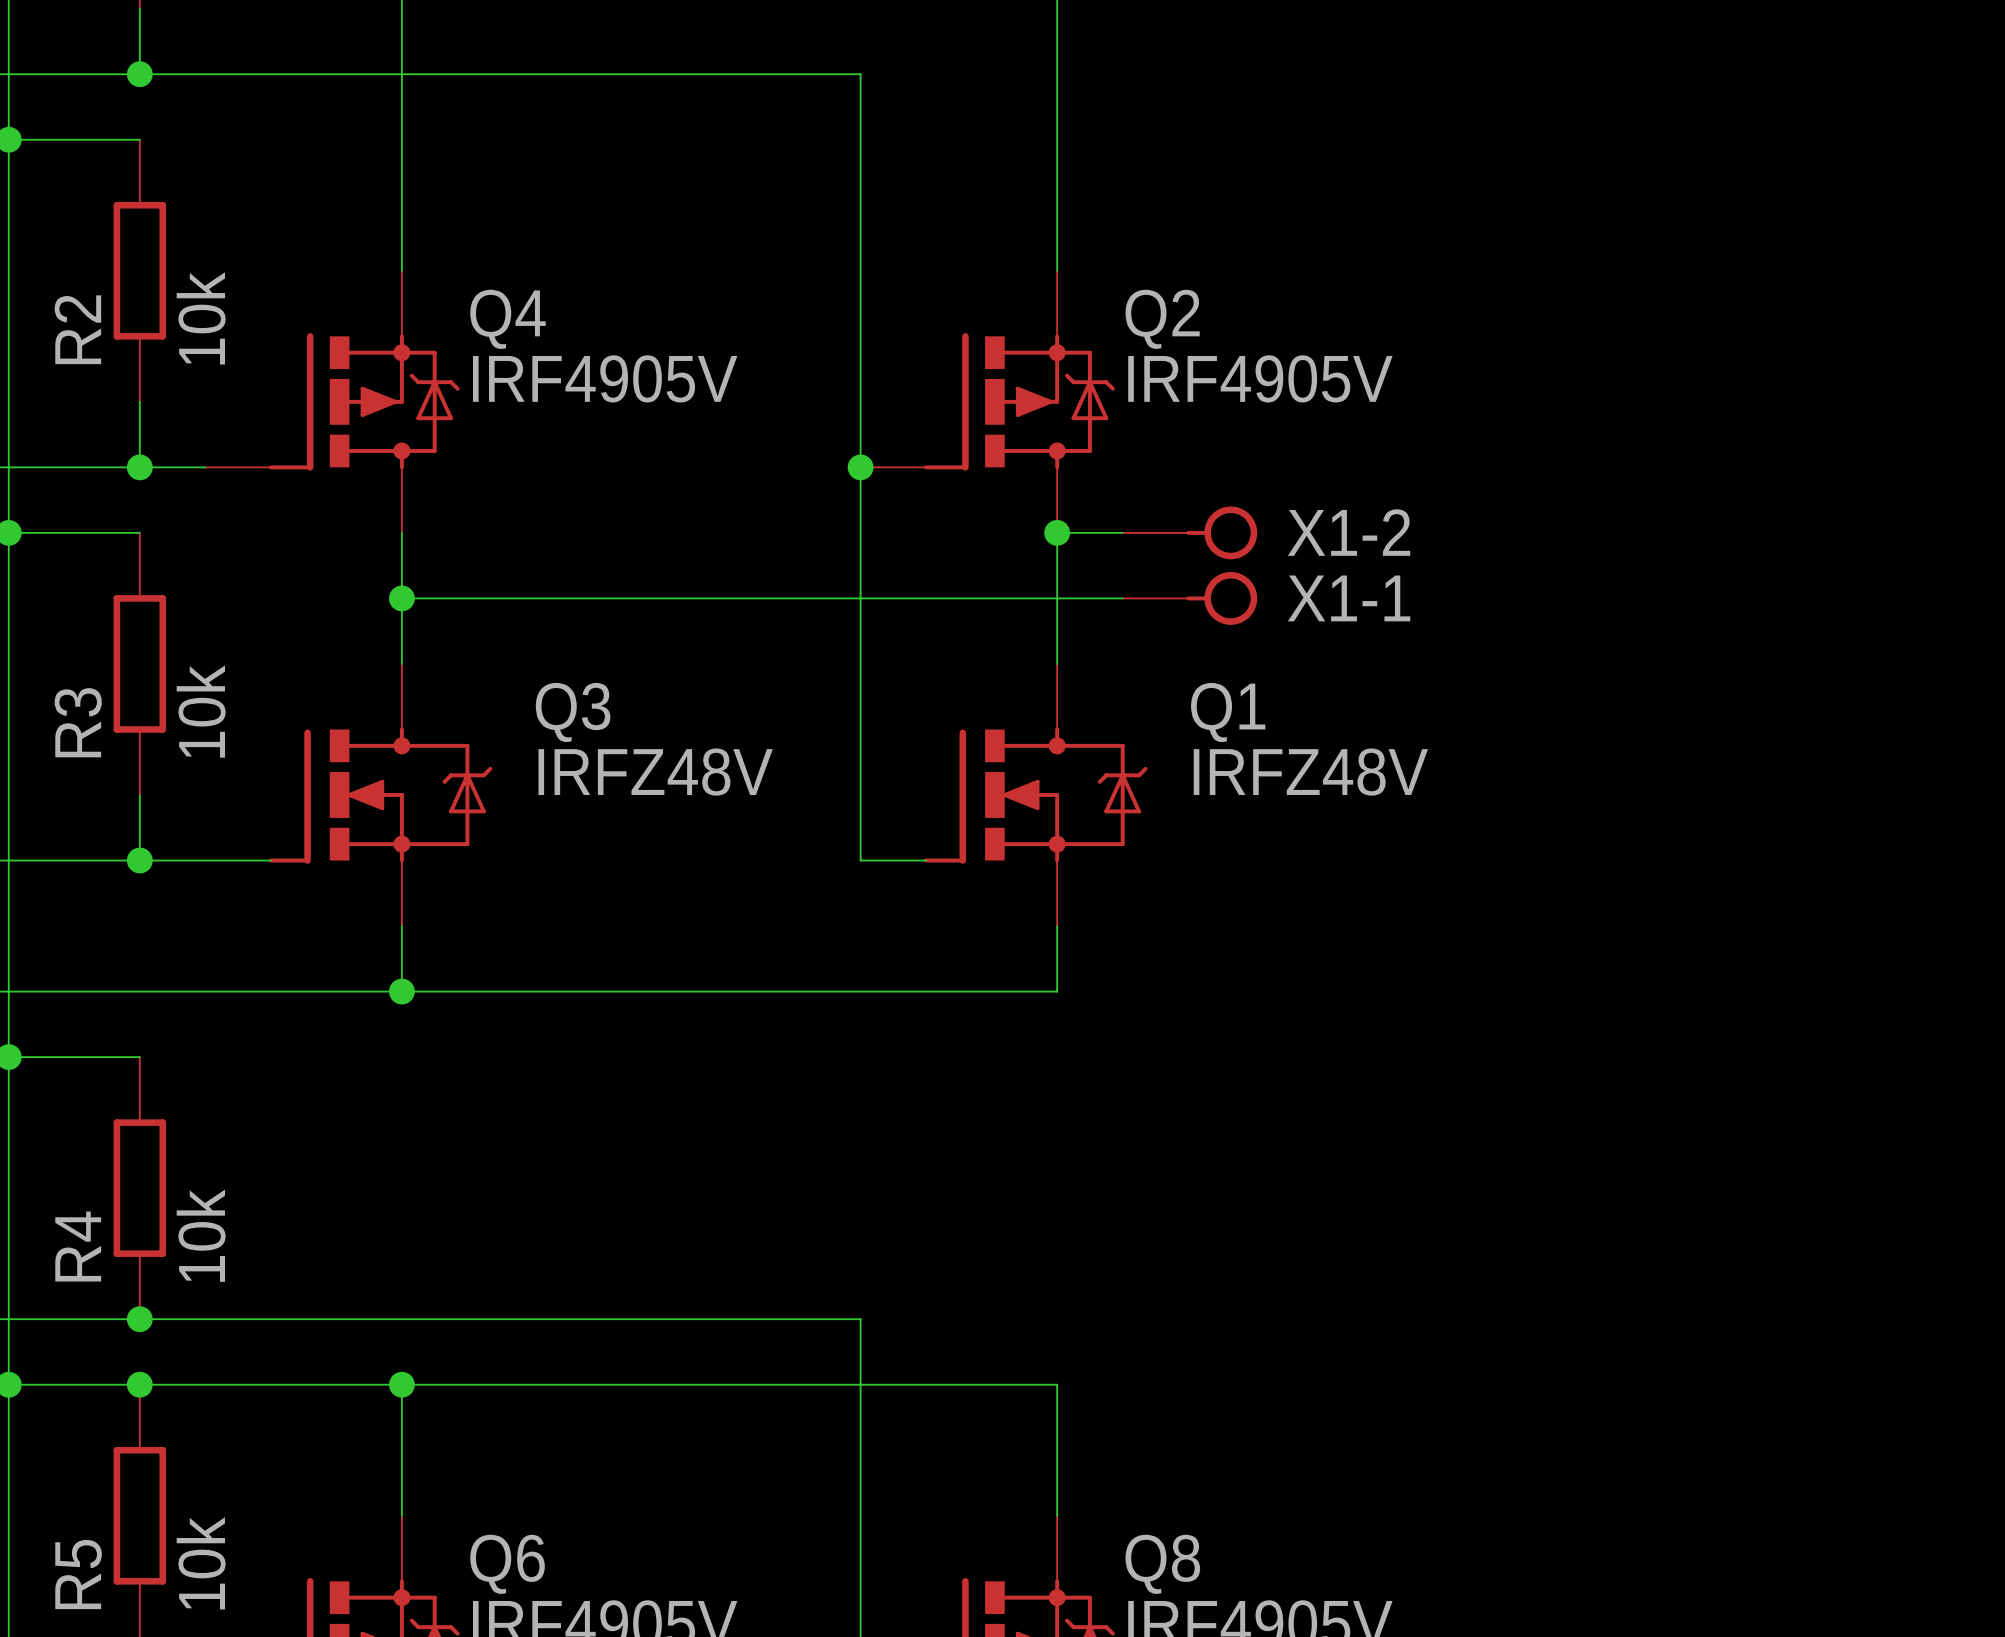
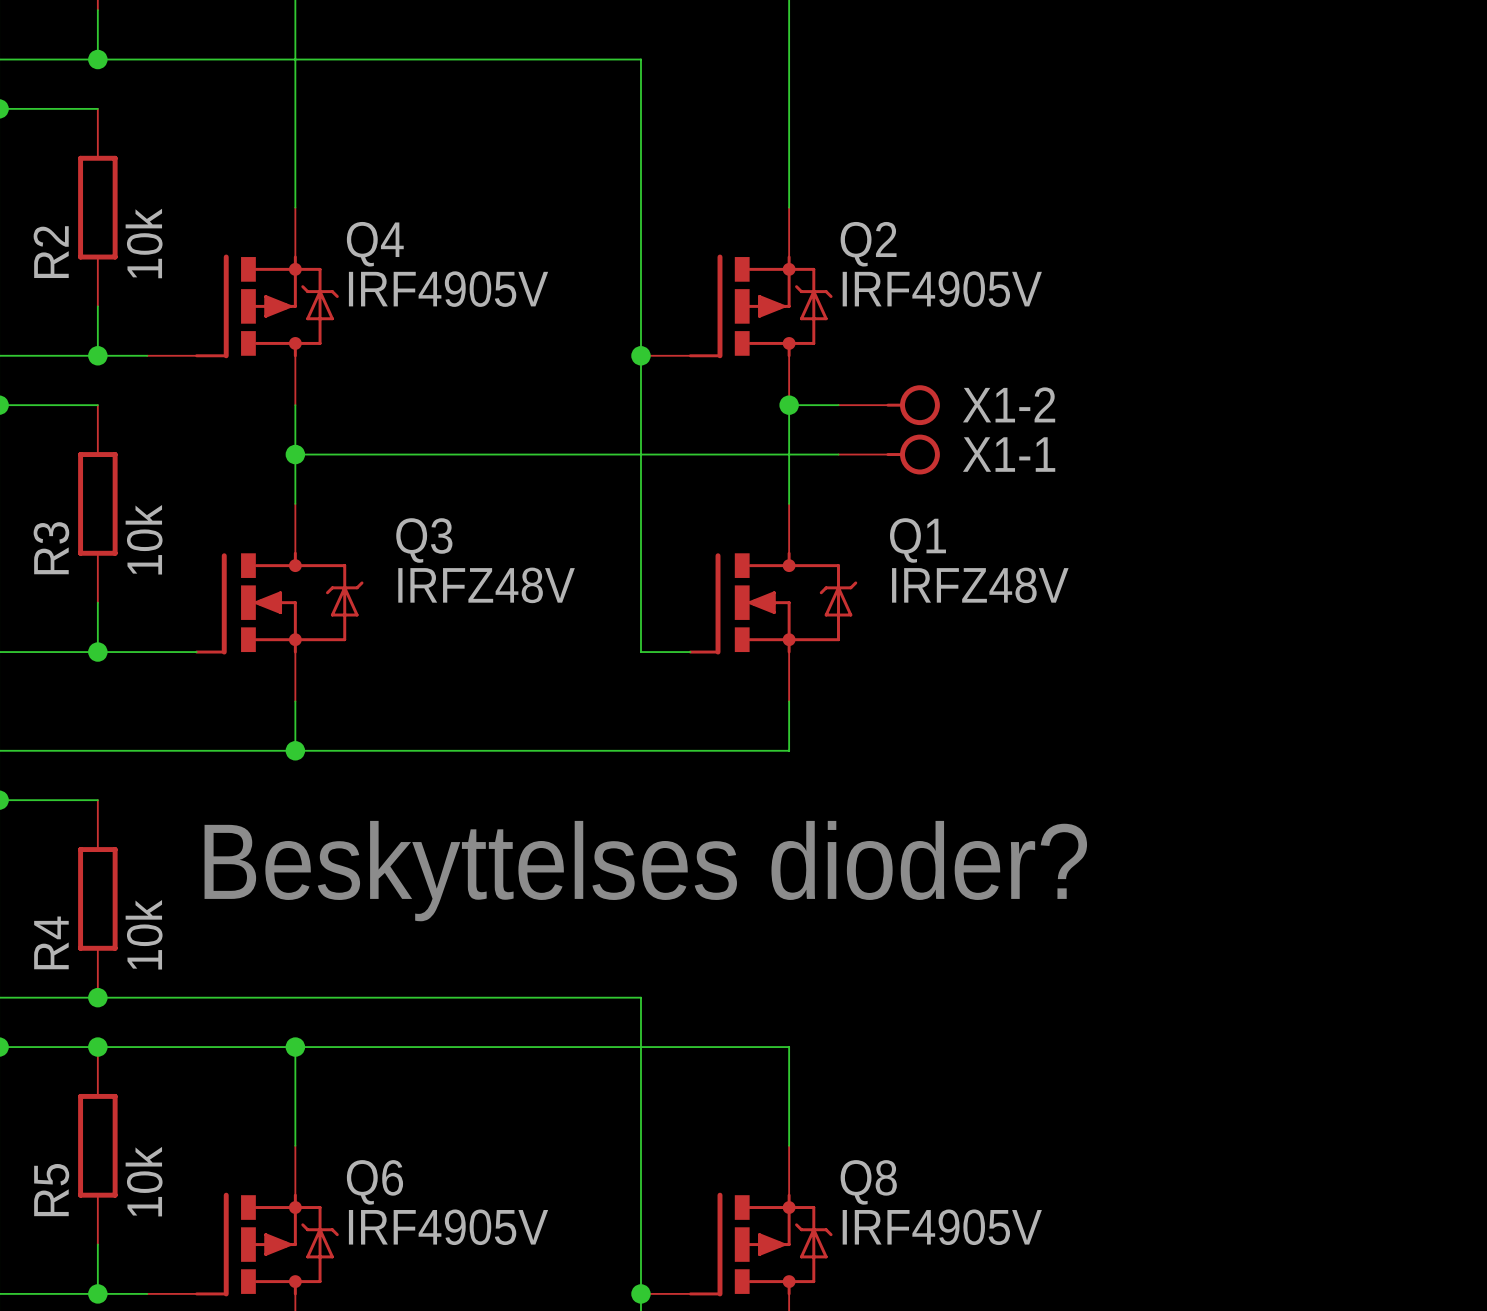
text: none -> Beskyttelses dioder? (645, 871)

